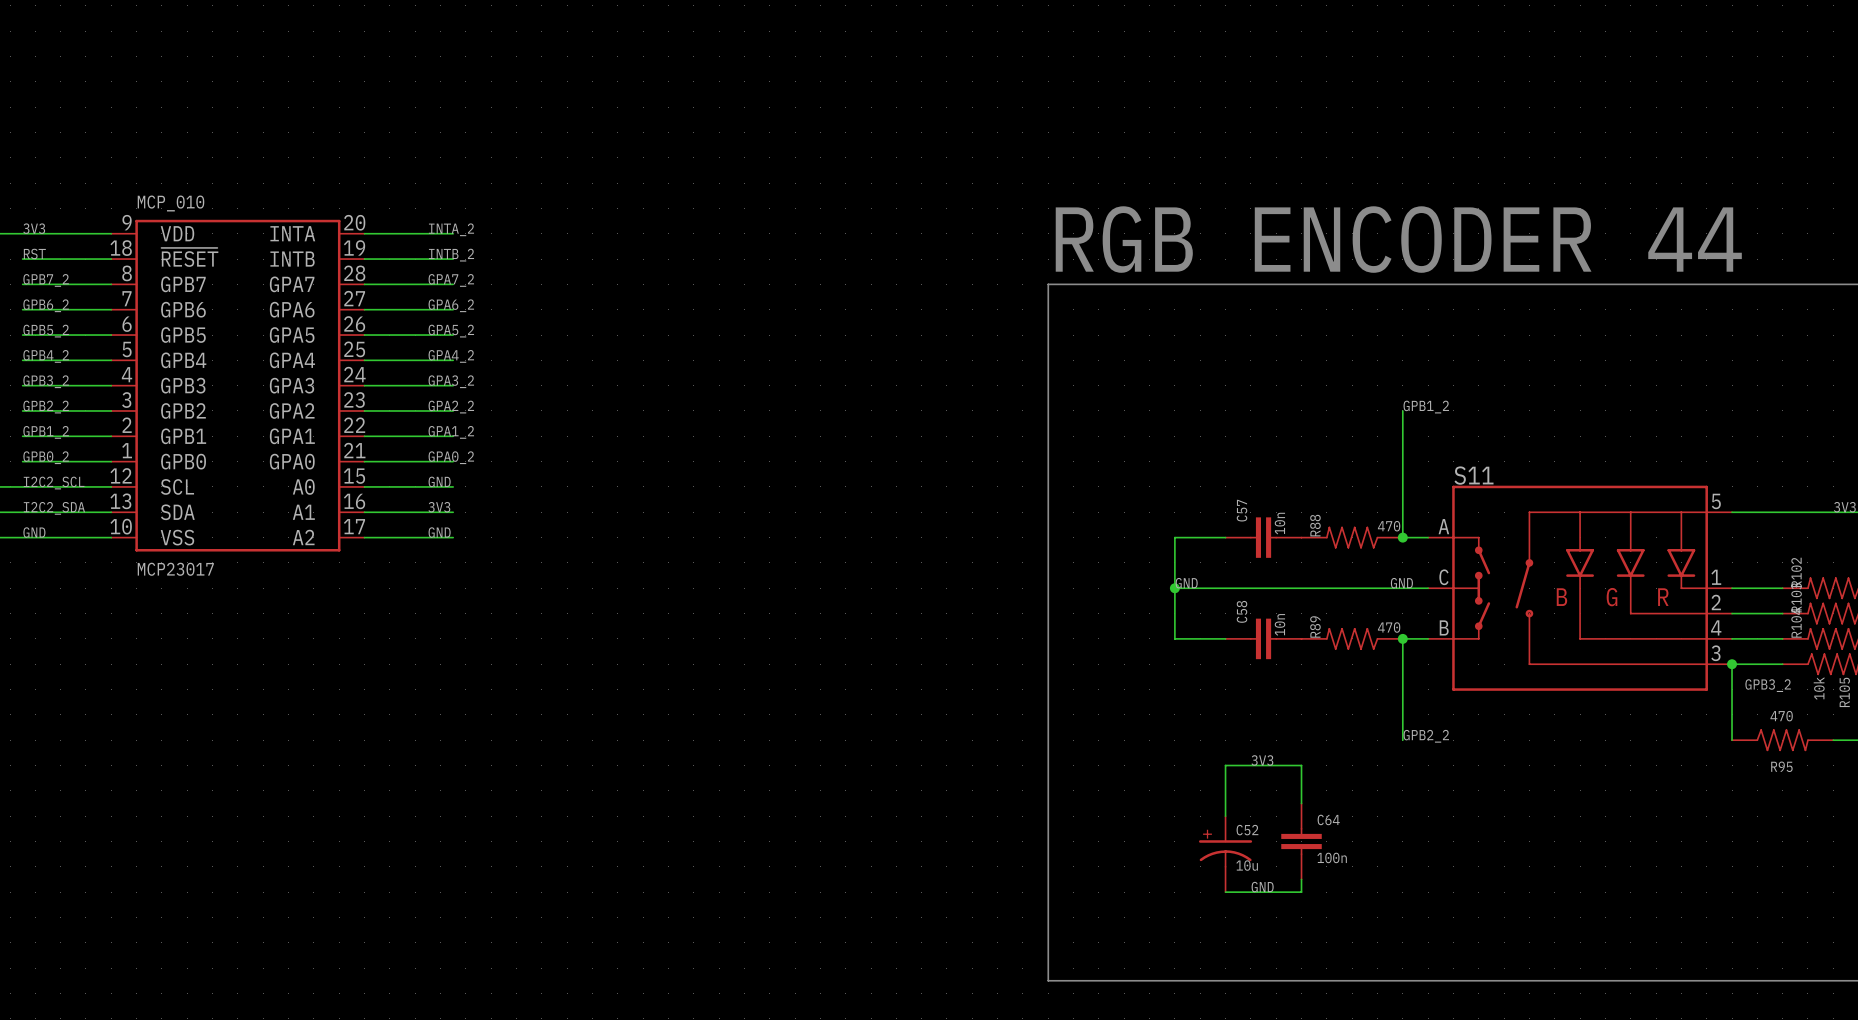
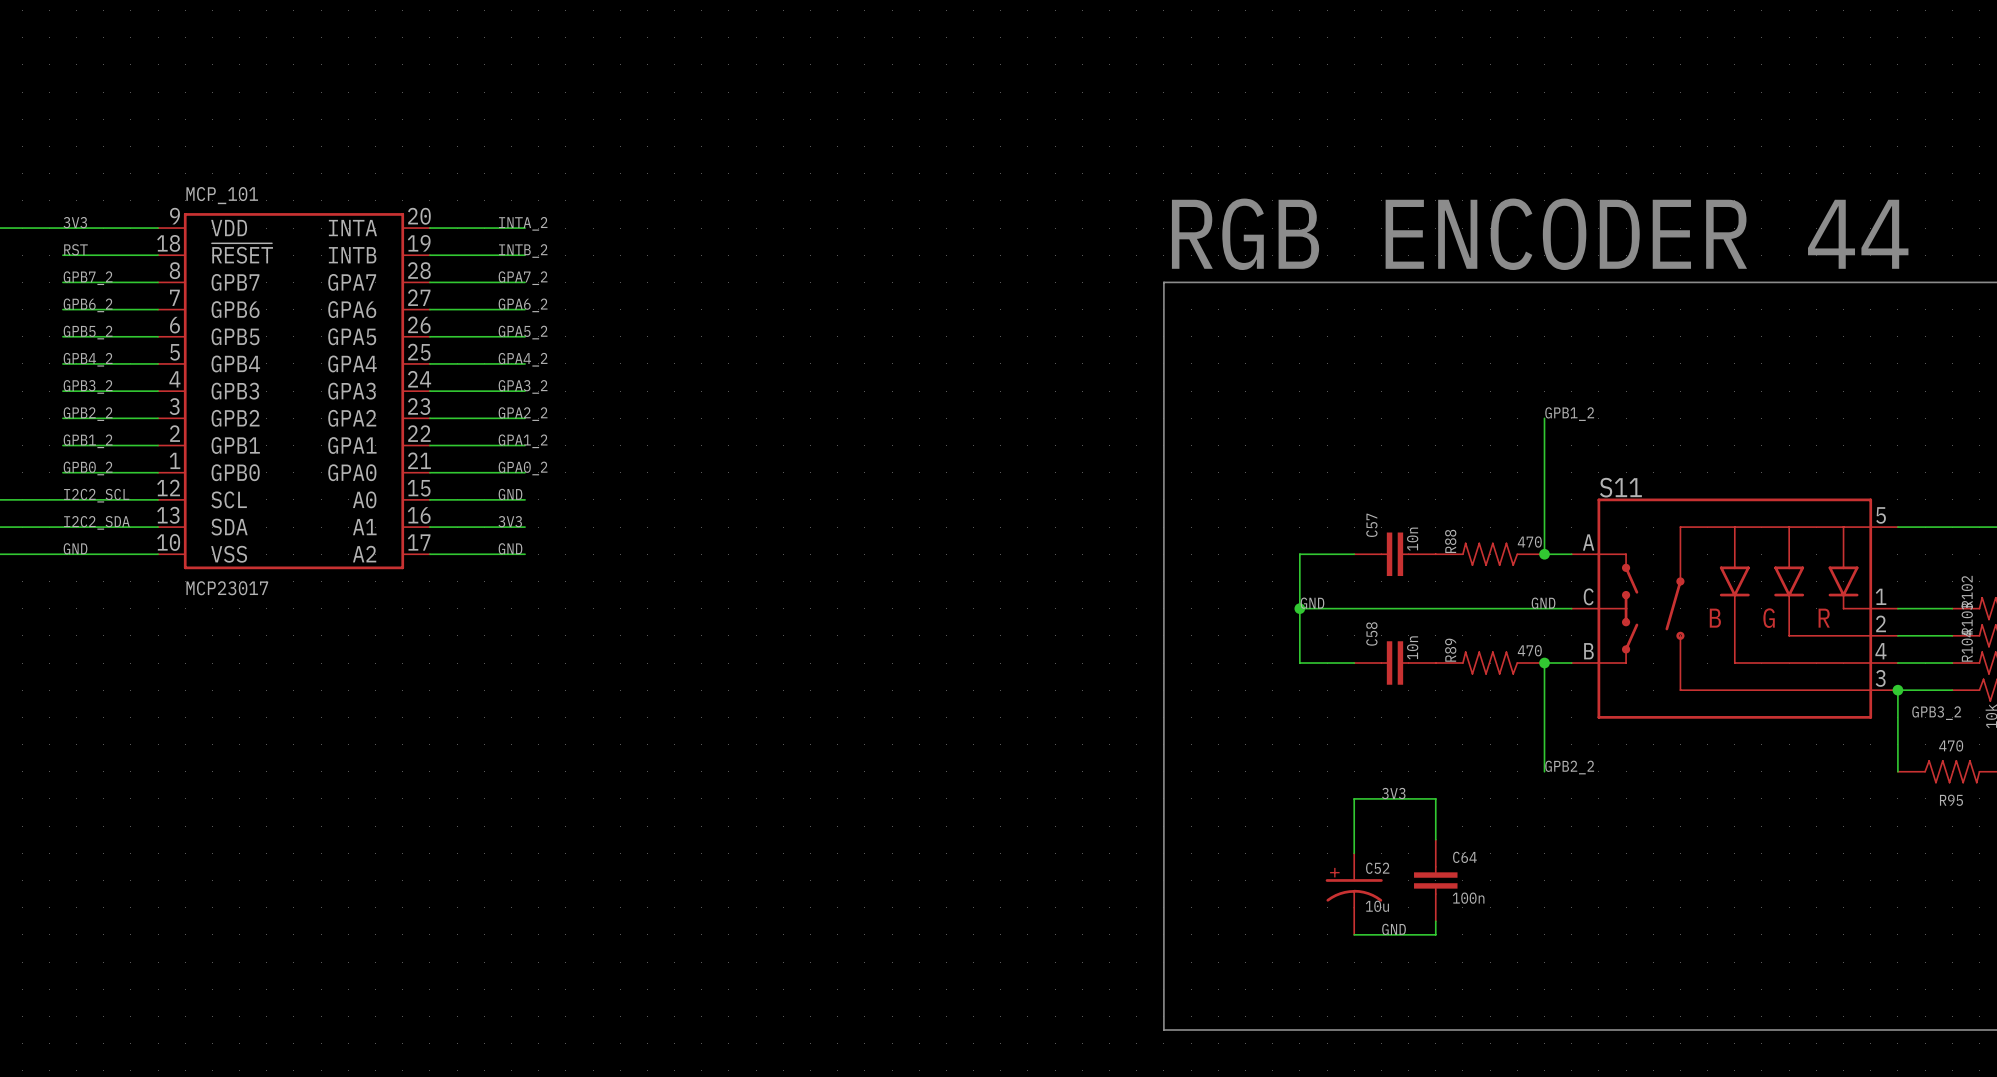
MCP_010 name: MCP_010 (171, 203) -> MCP_101 (222, 195)

